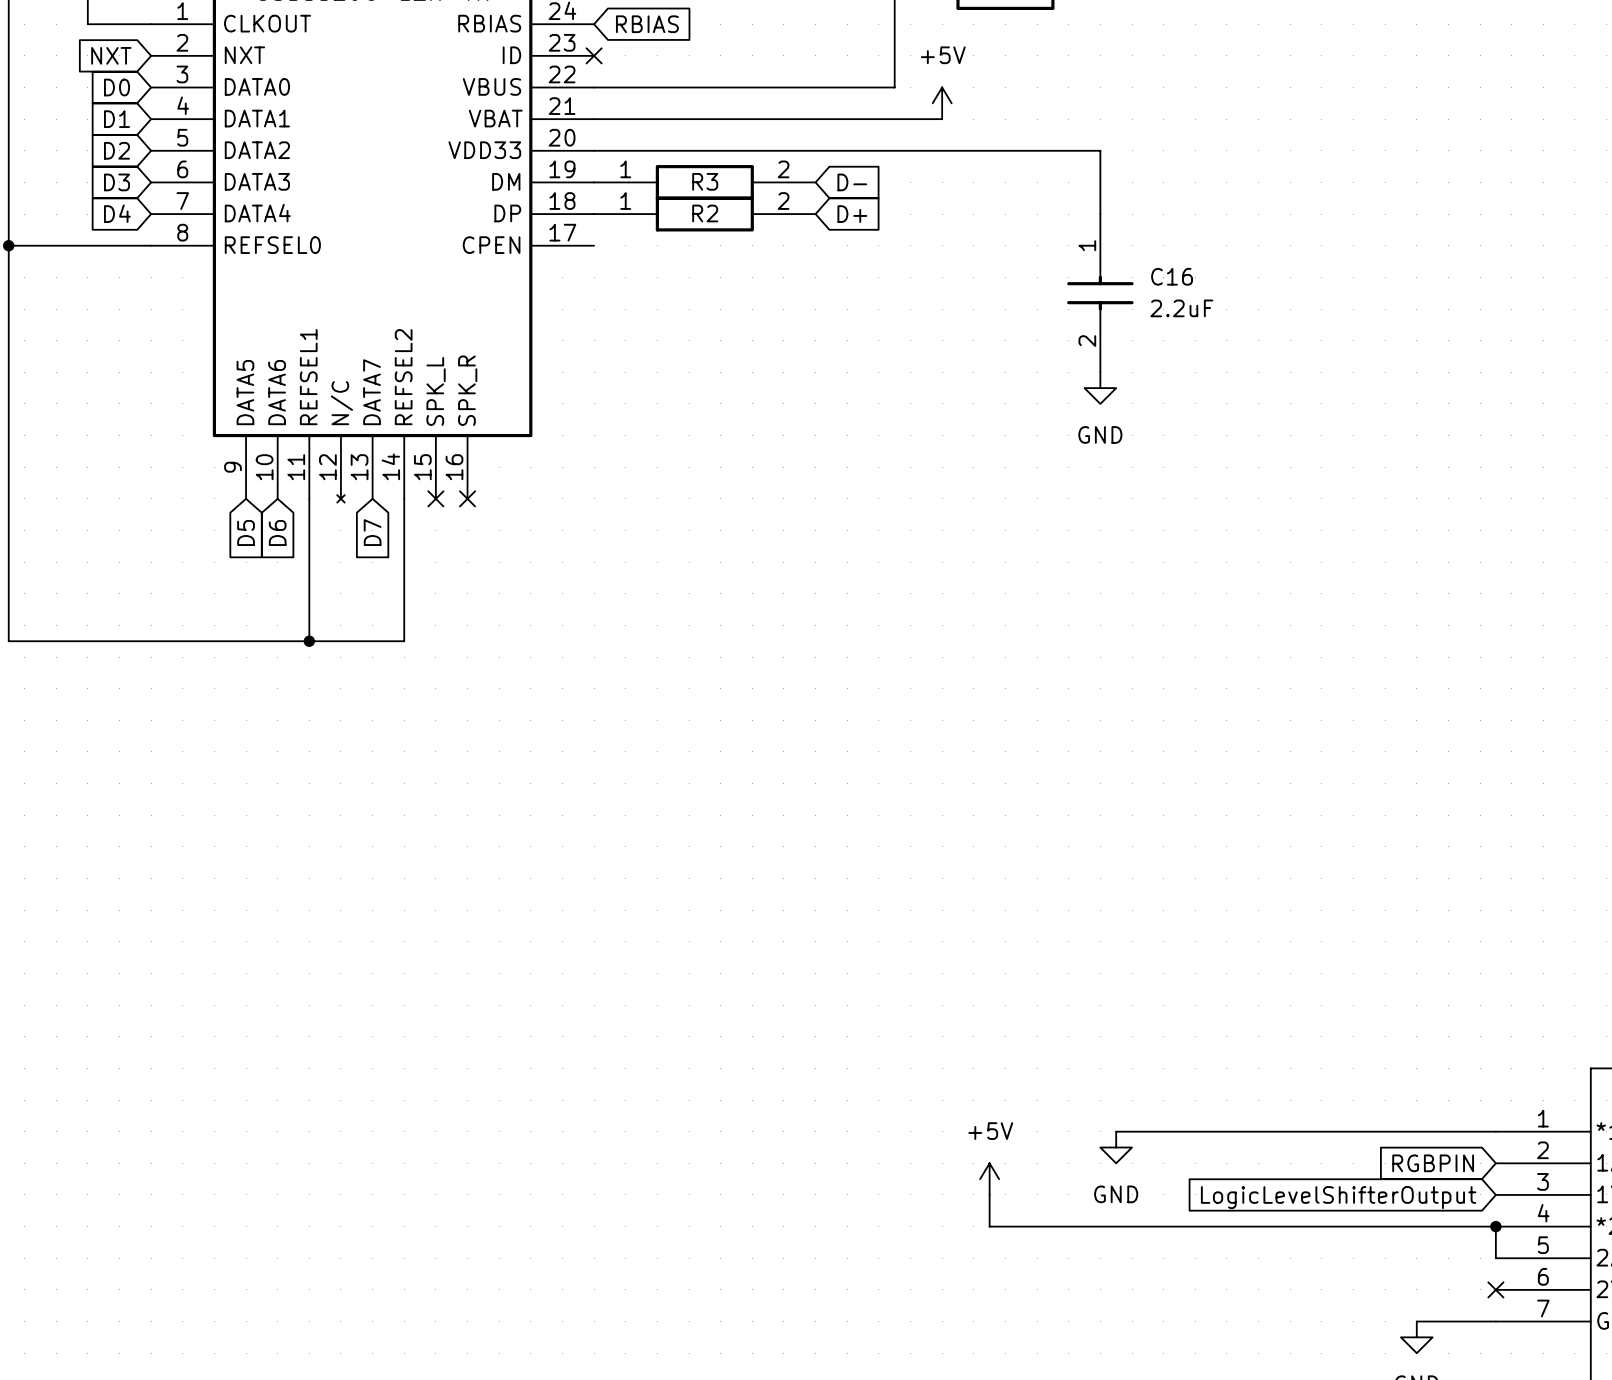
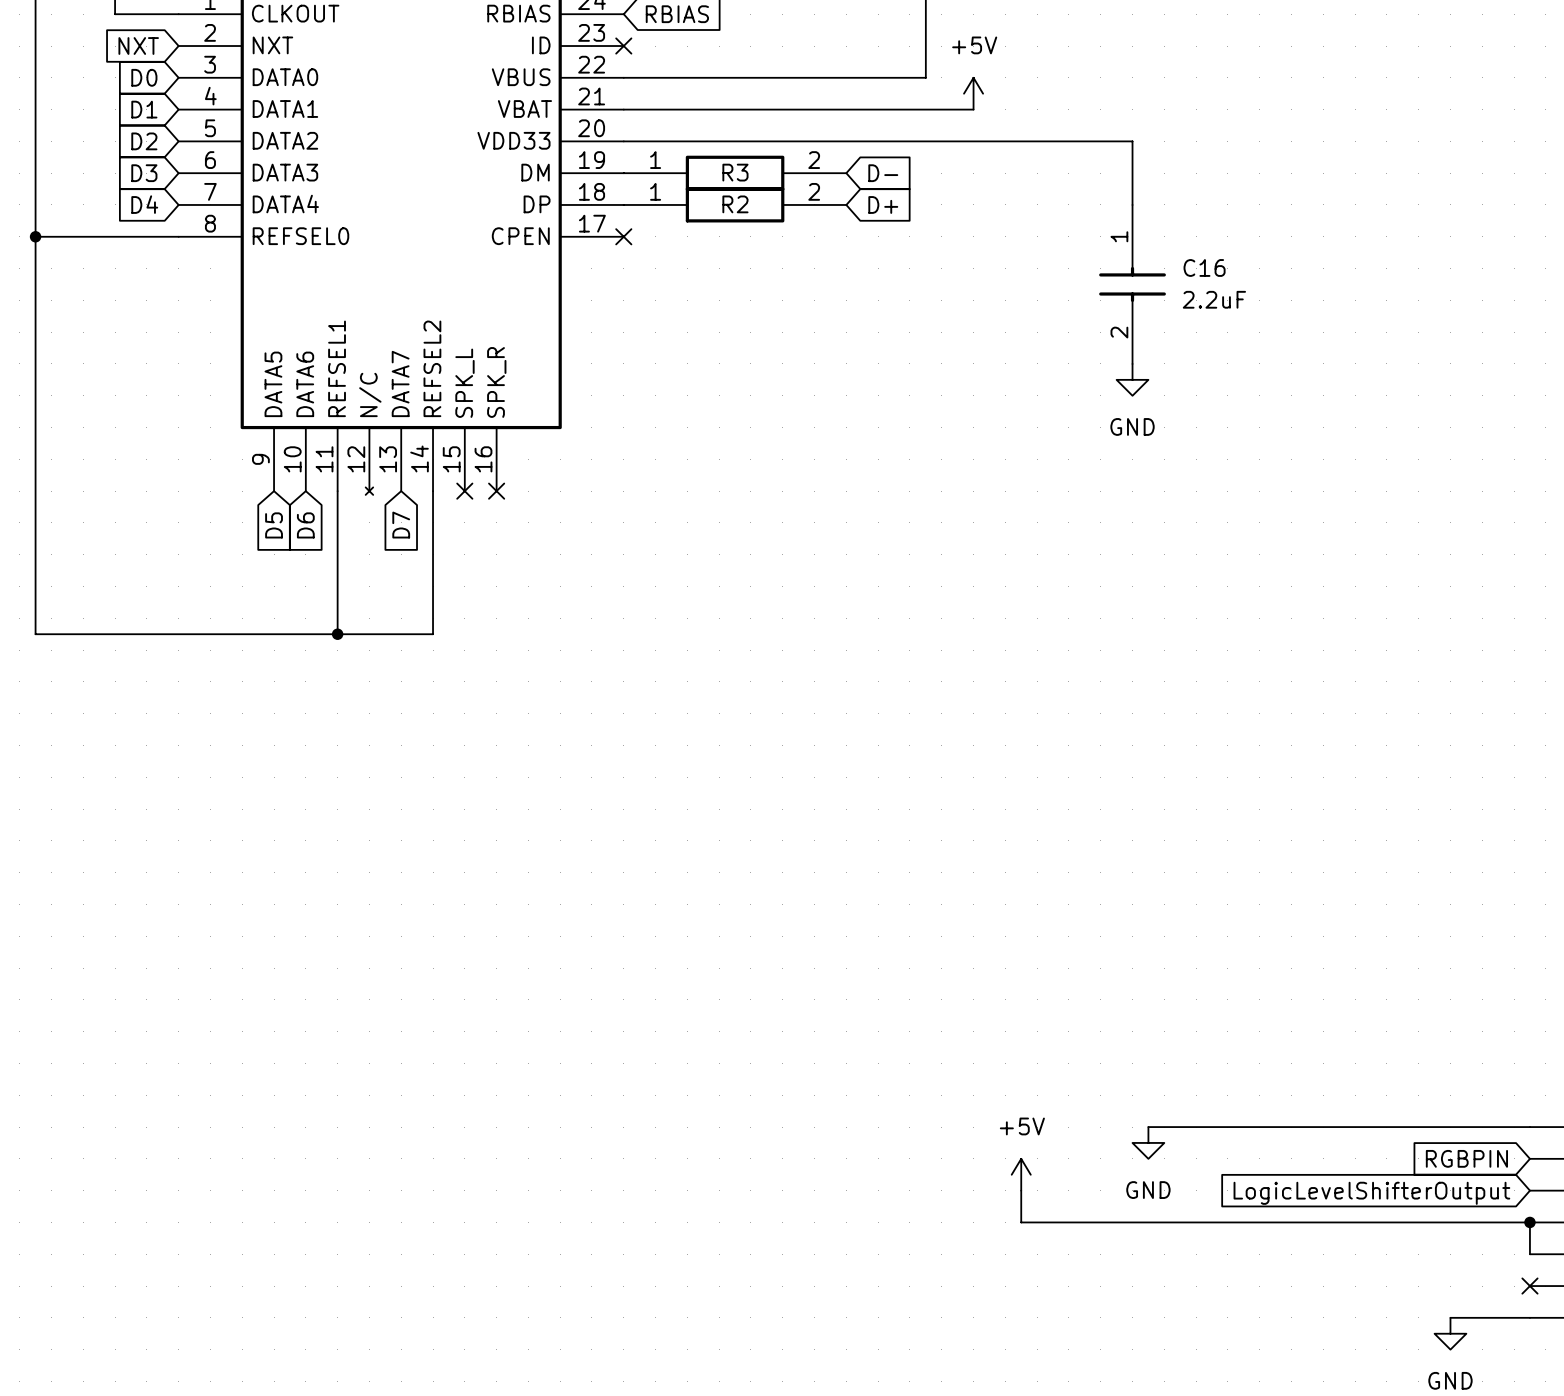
no-connect mark: none -> (623, 236)

